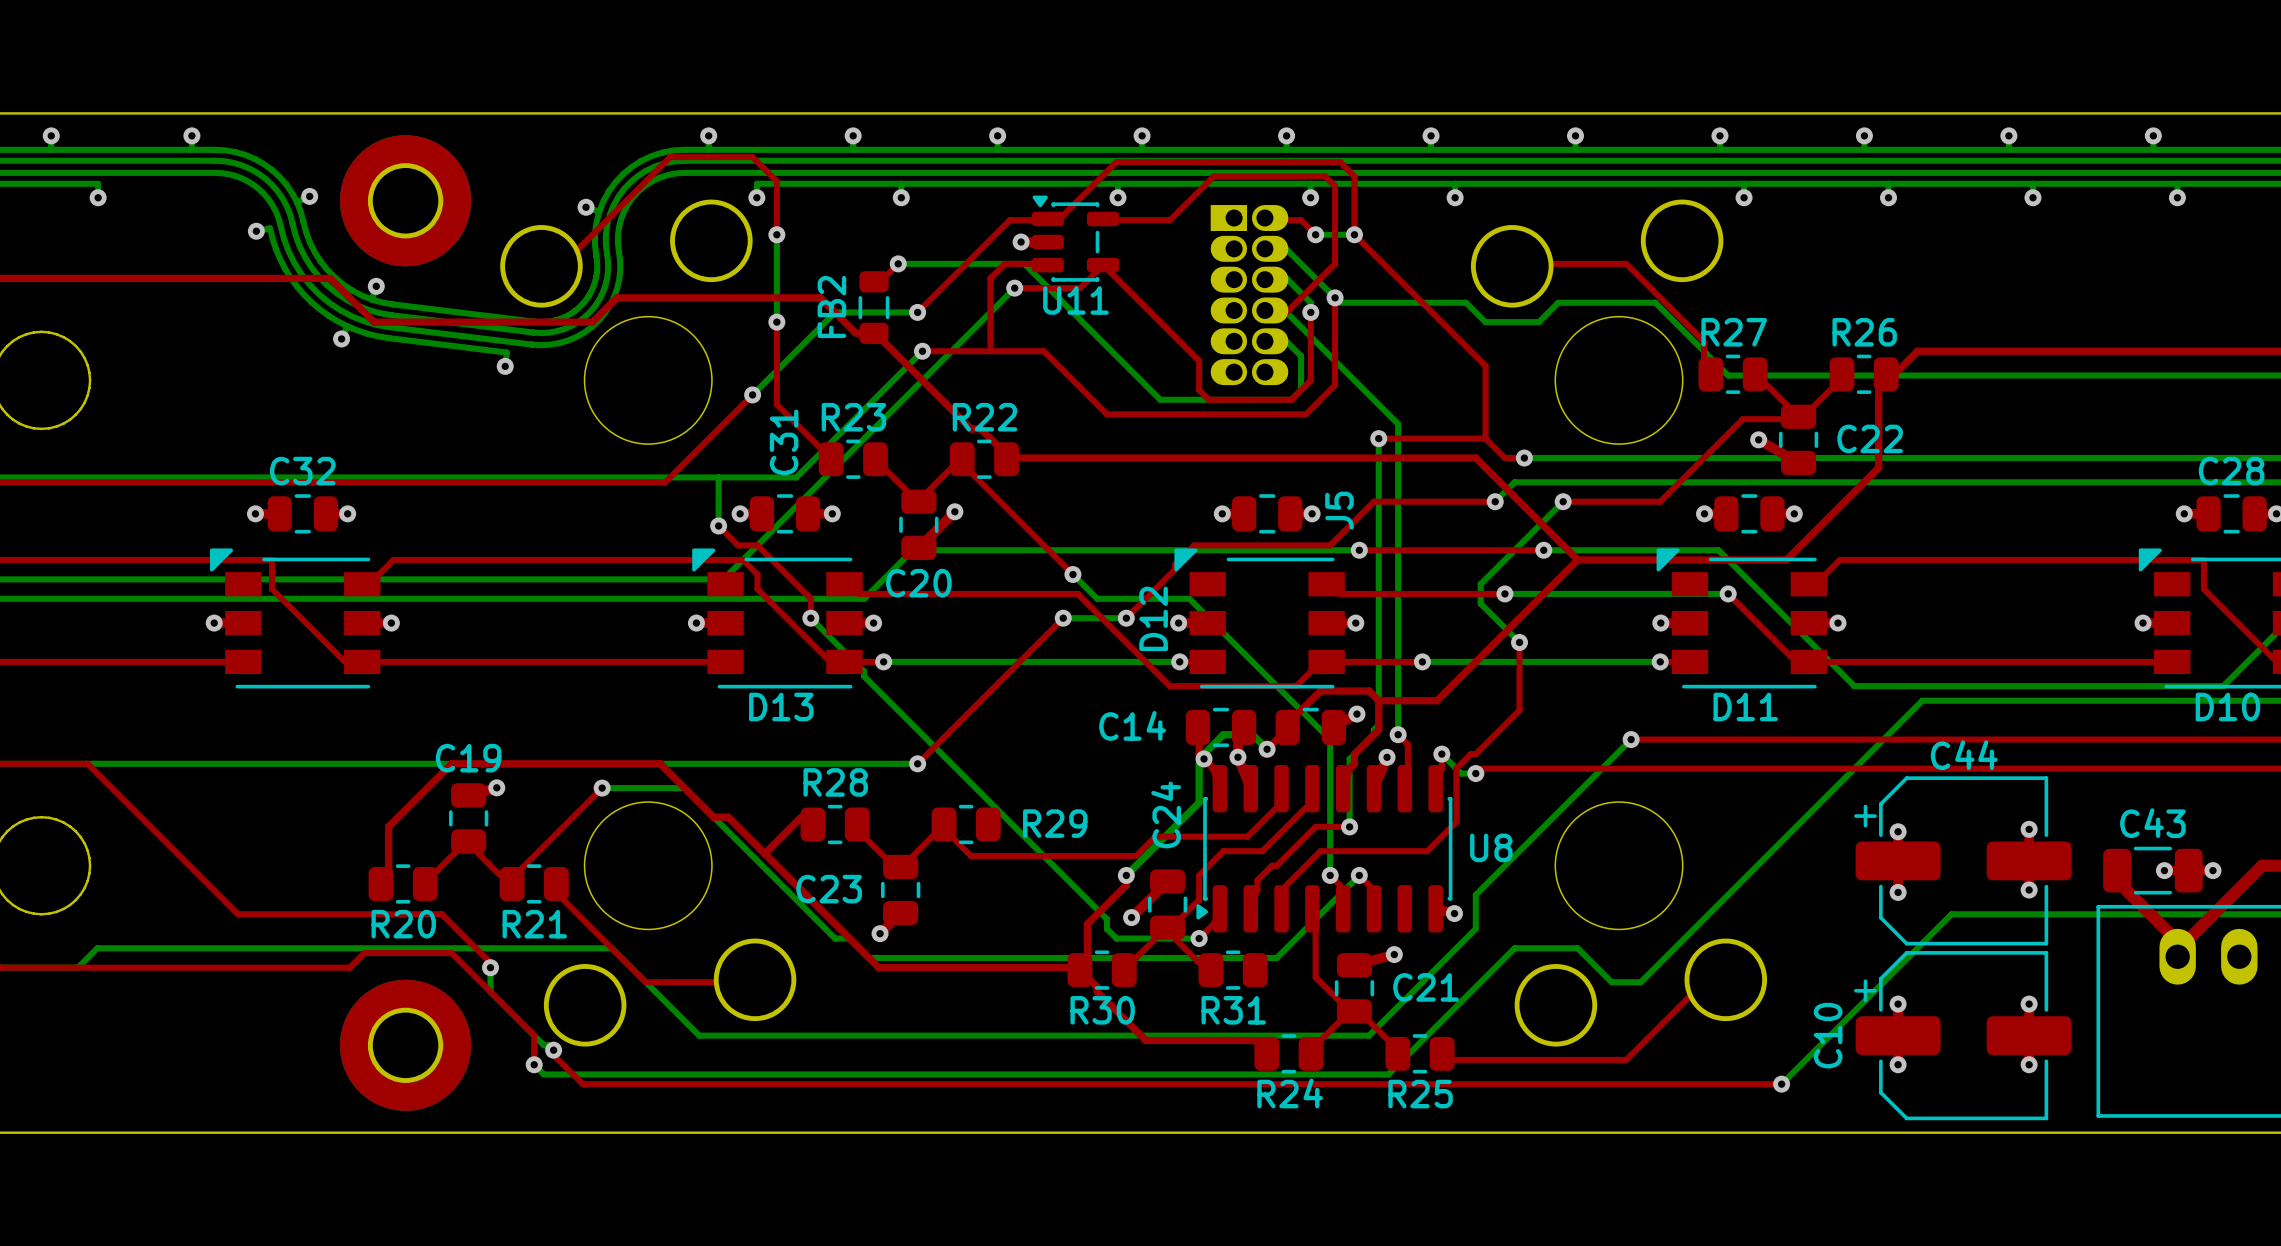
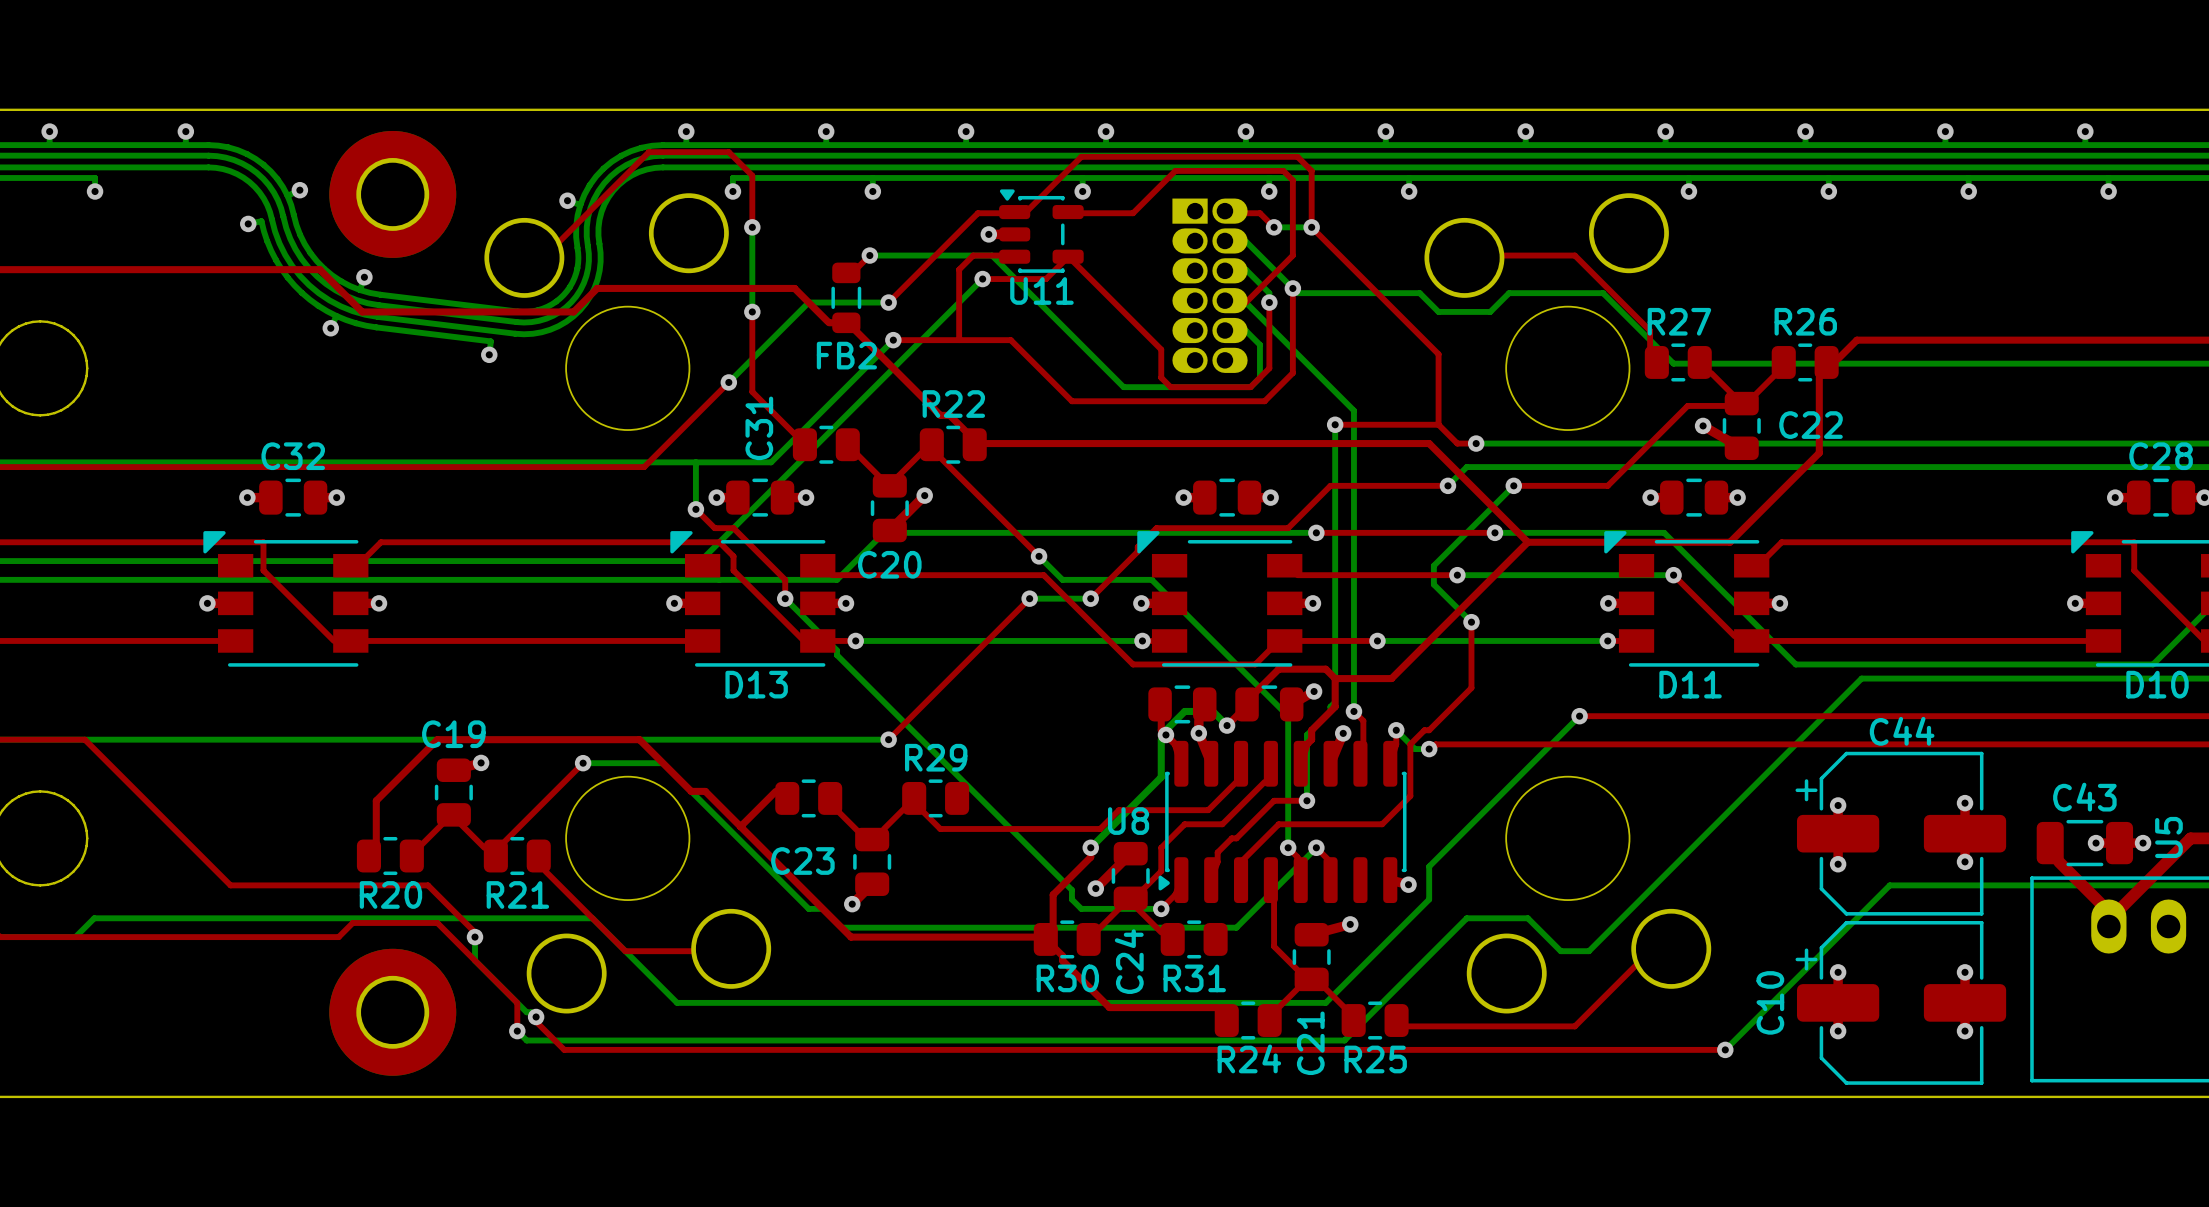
text rotation: 0° (831, 306) -> 90° clockwise (846, 355)
text: R23 (853, 417) -> none
text: J5 (1339, 510) -> none
text: D12 (1153, 618) -> none
text: C14 (1132, 725) -> none
text: R28 (835, 782) -> none
text position: C24 (1166, 814) -> C24 (1129, 961)
text position: R29 (1055, 823) -> R29 (936, 757)
text position: U8 (1491, 847) -> U8 (1128, 821)
text: none -> U5 (2168, 837)
text rotation: 0° (1426, 987) -> 90° counterclockwise (1310, 1043)
text position: C21 (1426, 987) -> C21 (1310, 1043)

